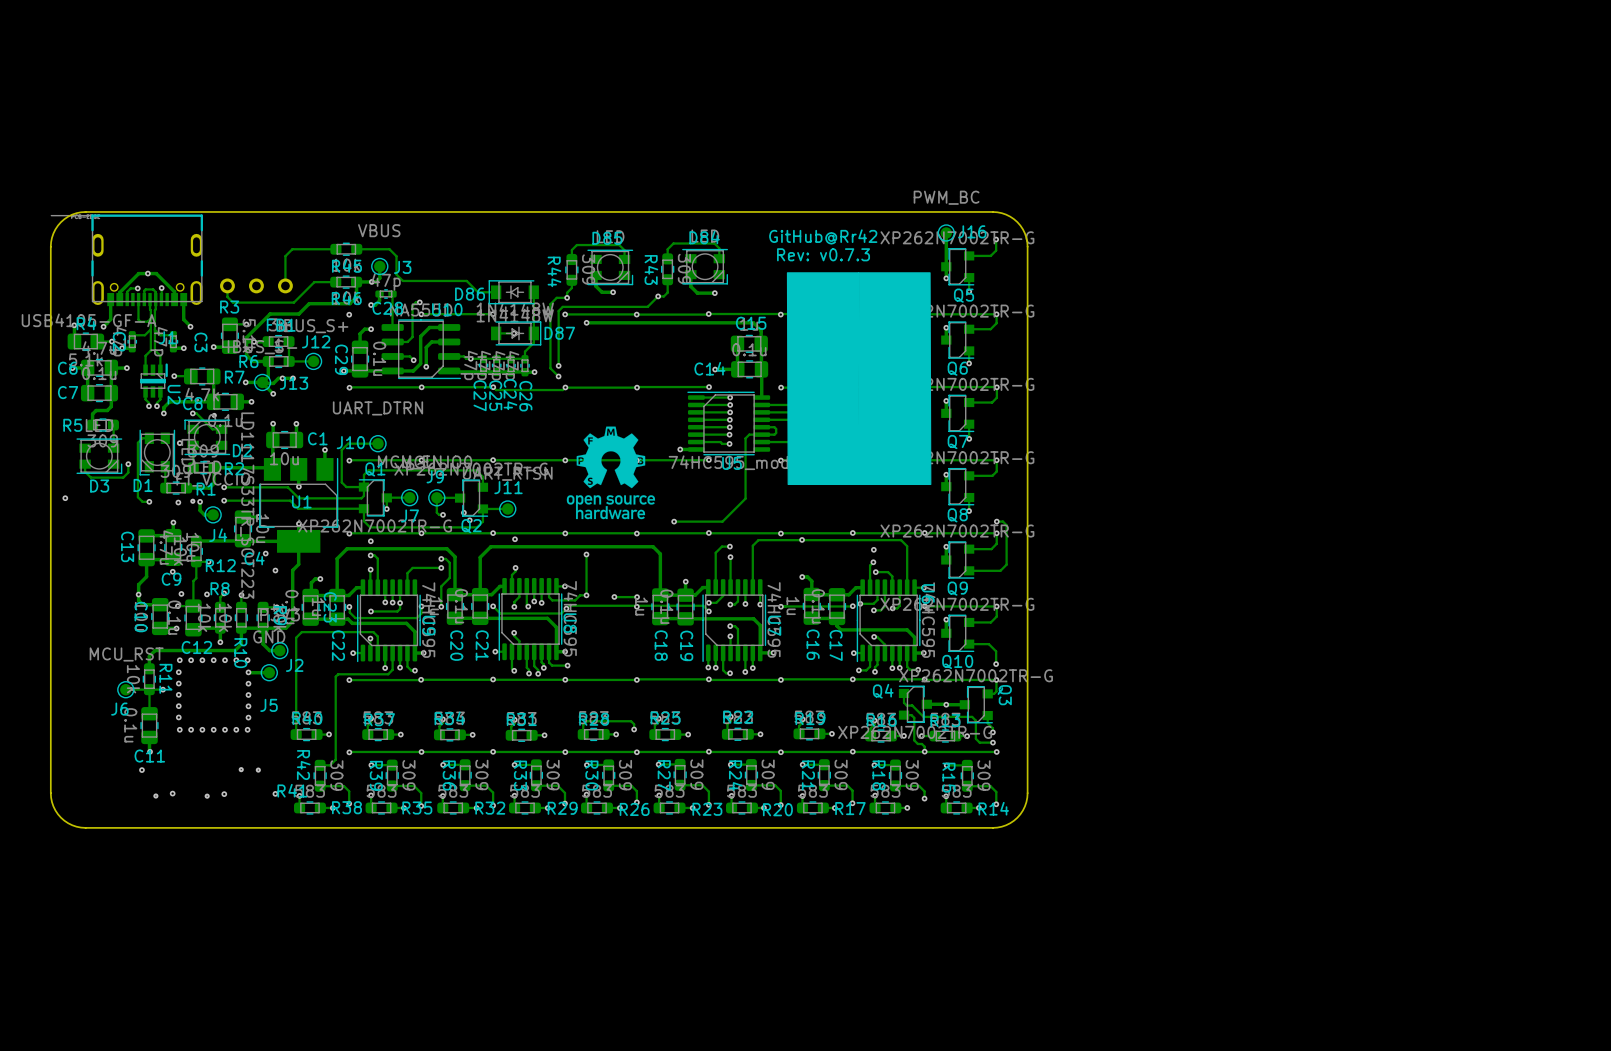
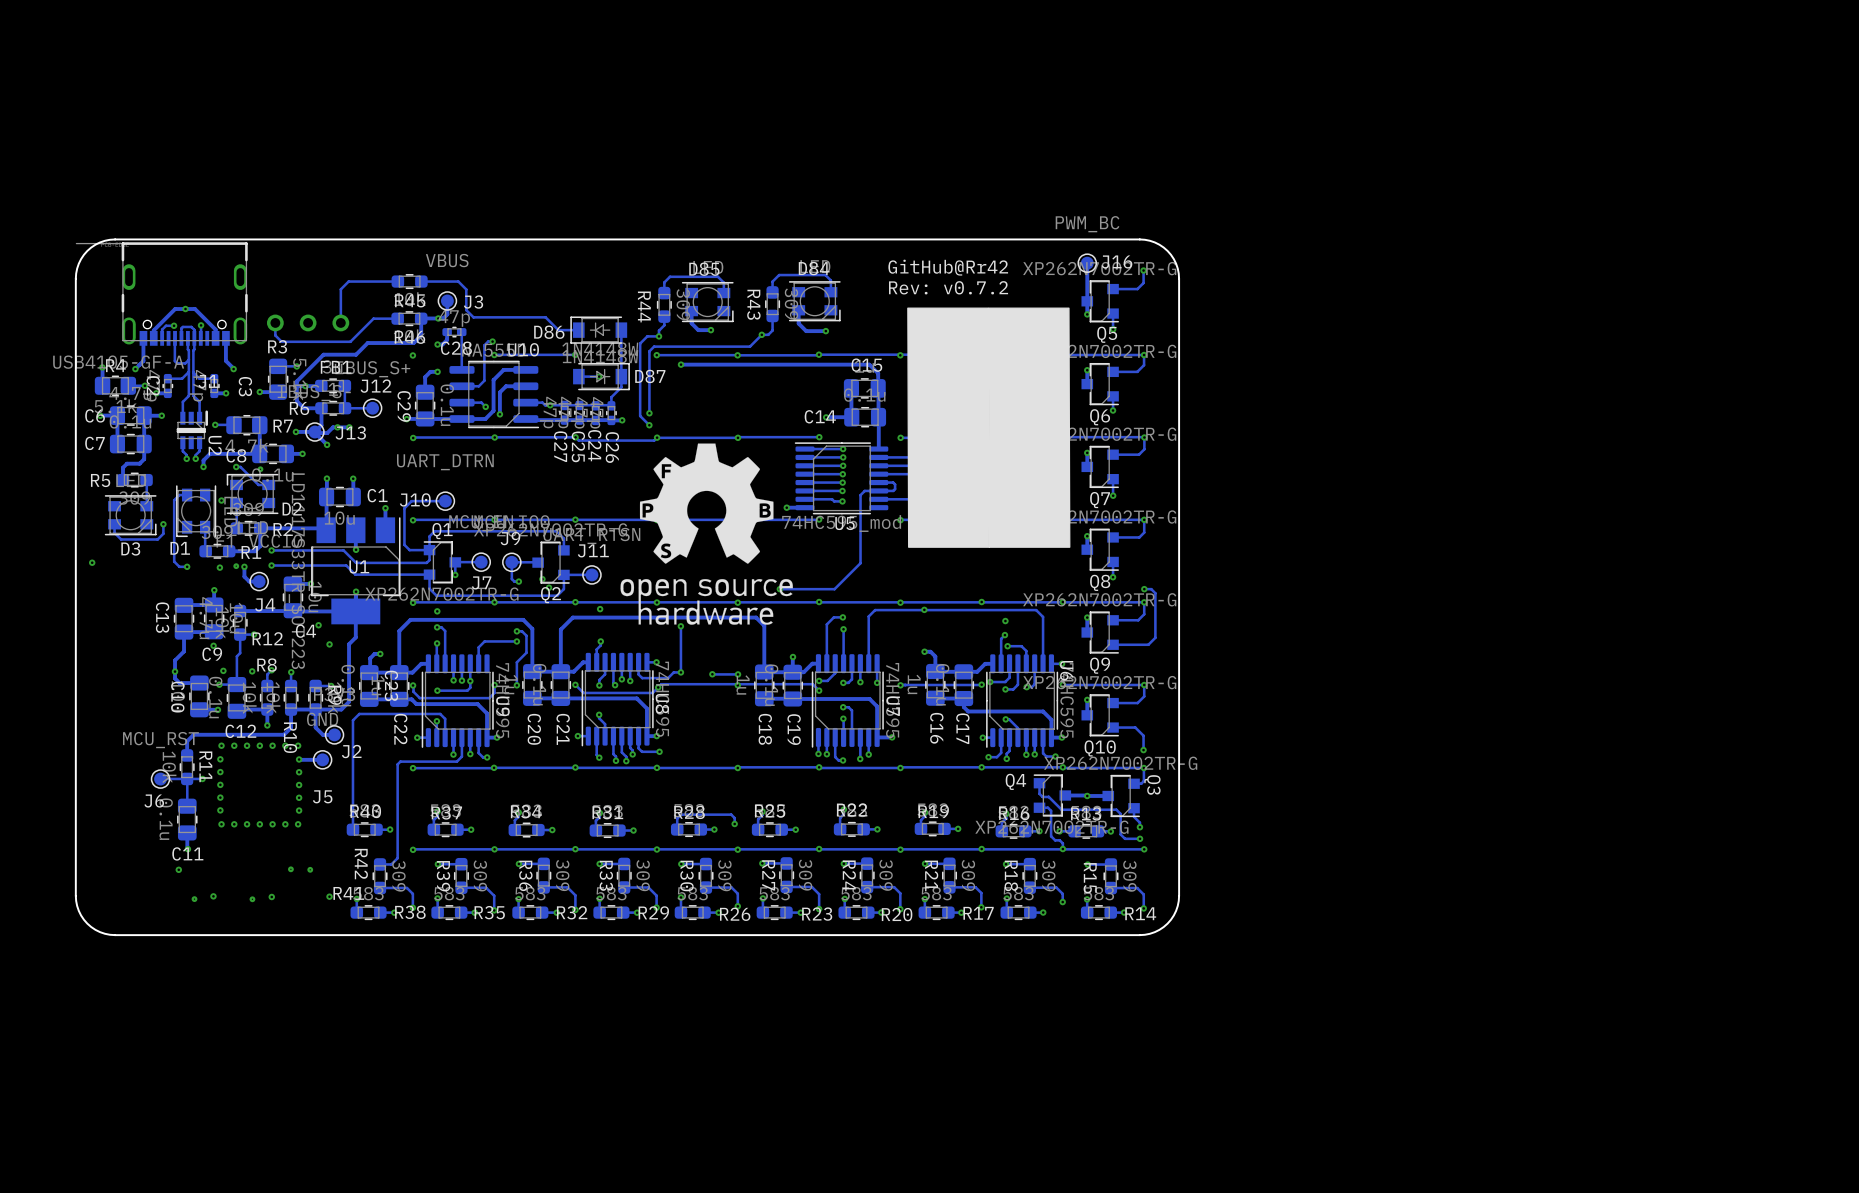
text: Rev: v0.7.3 (823, 254) -> Rev: v0.7.2 (948, 287)
drawing shape: [566, 426, 656, 520] -> [620, 443, 793, 625]

